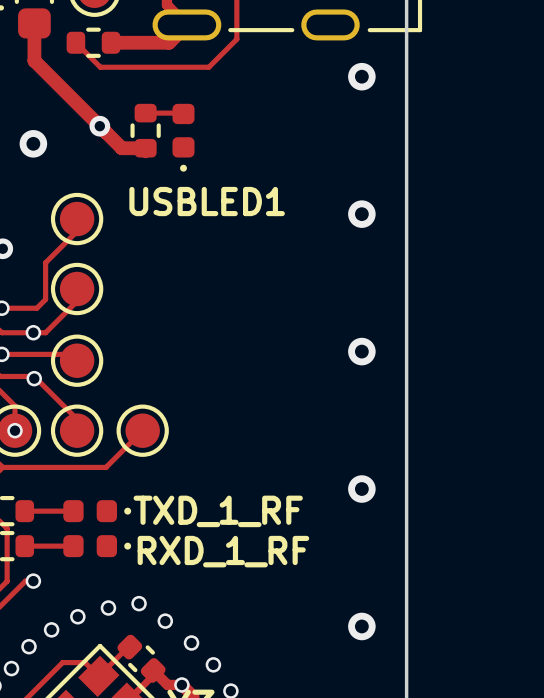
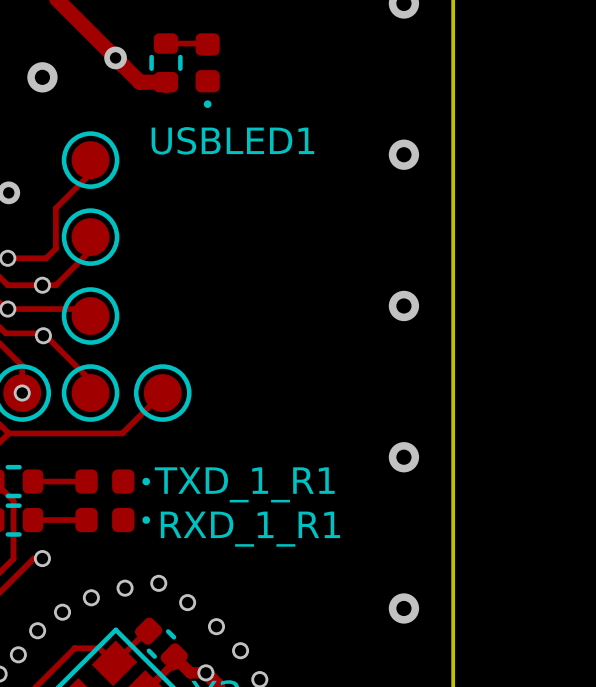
TXD_1_RF name: TXD_1_RF (218, 511) -> TXD_1_R1 (244, 484)
RXD_1_RF name: RXD_1_RF (223, 551) -> RXD_1_R1 (250, 529)

